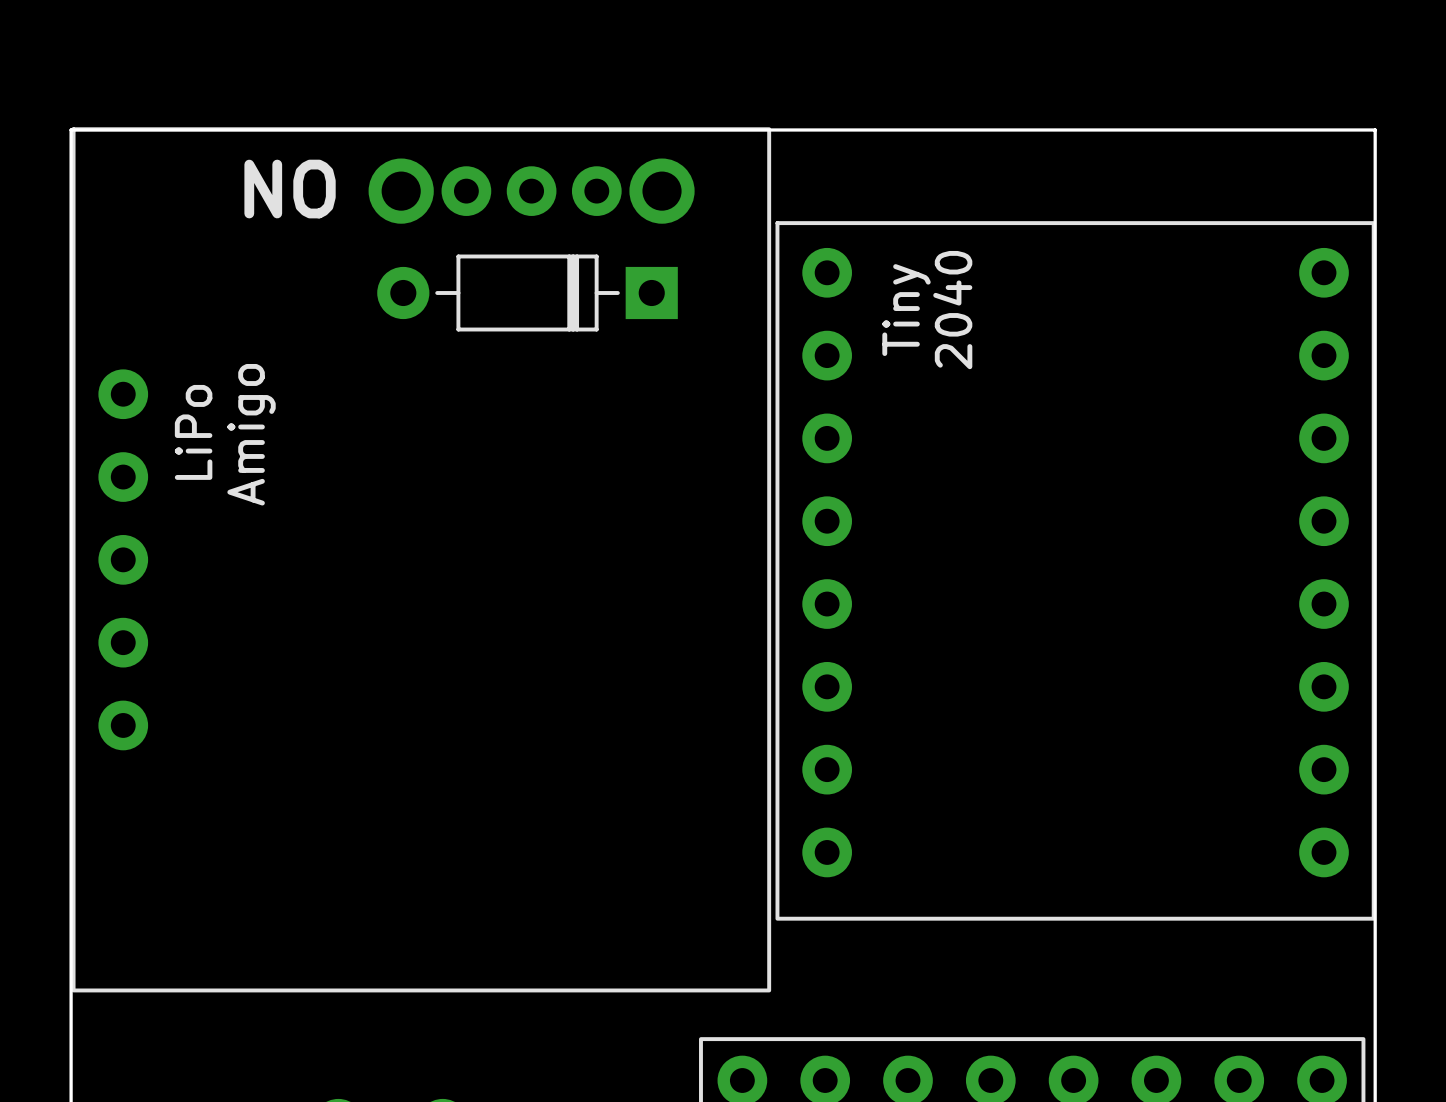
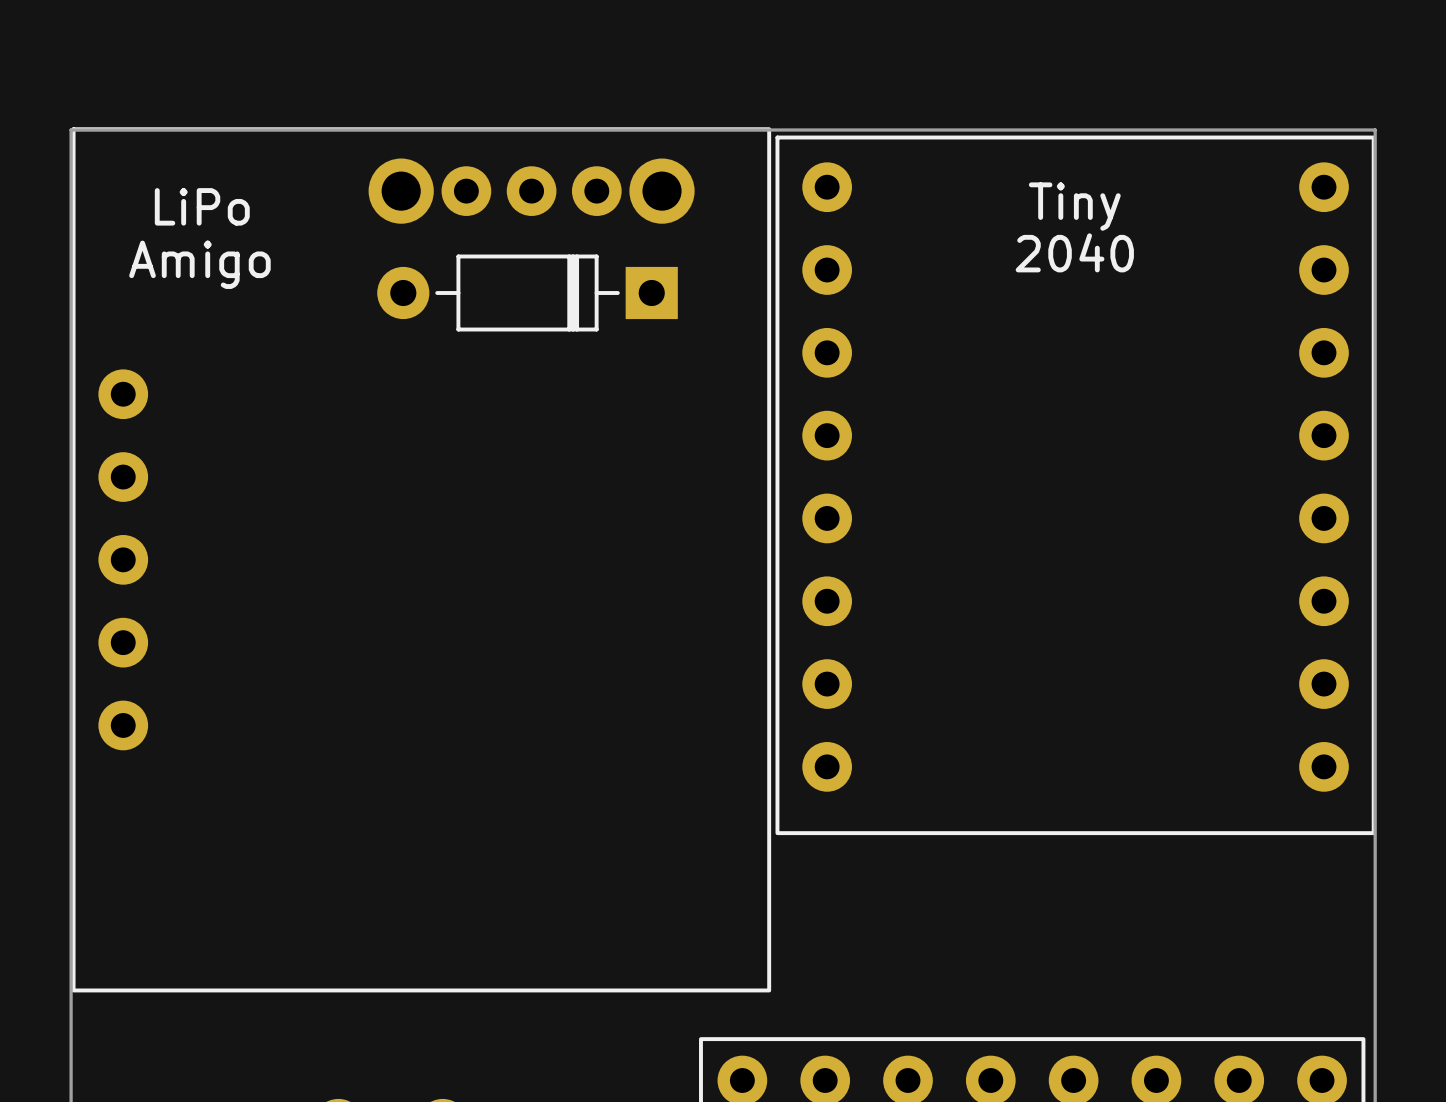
text: ON (290, 189) -> none
text rotation: 0° (906, 310) -> 90° clockwise (1074, 206)
text position: Tiny (906, 310) -> Tiny (1074, 206)
text rotation: 0° (952, 310) -> 90° clockwise (1074, 252)
text rotation: 0° (193, 432) -> 90° clockwise (202, 206)
text position: LiPo (193, 432) -> LiPo (202, 206)
text rotation: 0° (251, 434) -> 90° clockwise (199, 264)
part position: (1075, 570) -> (1075, 485)

